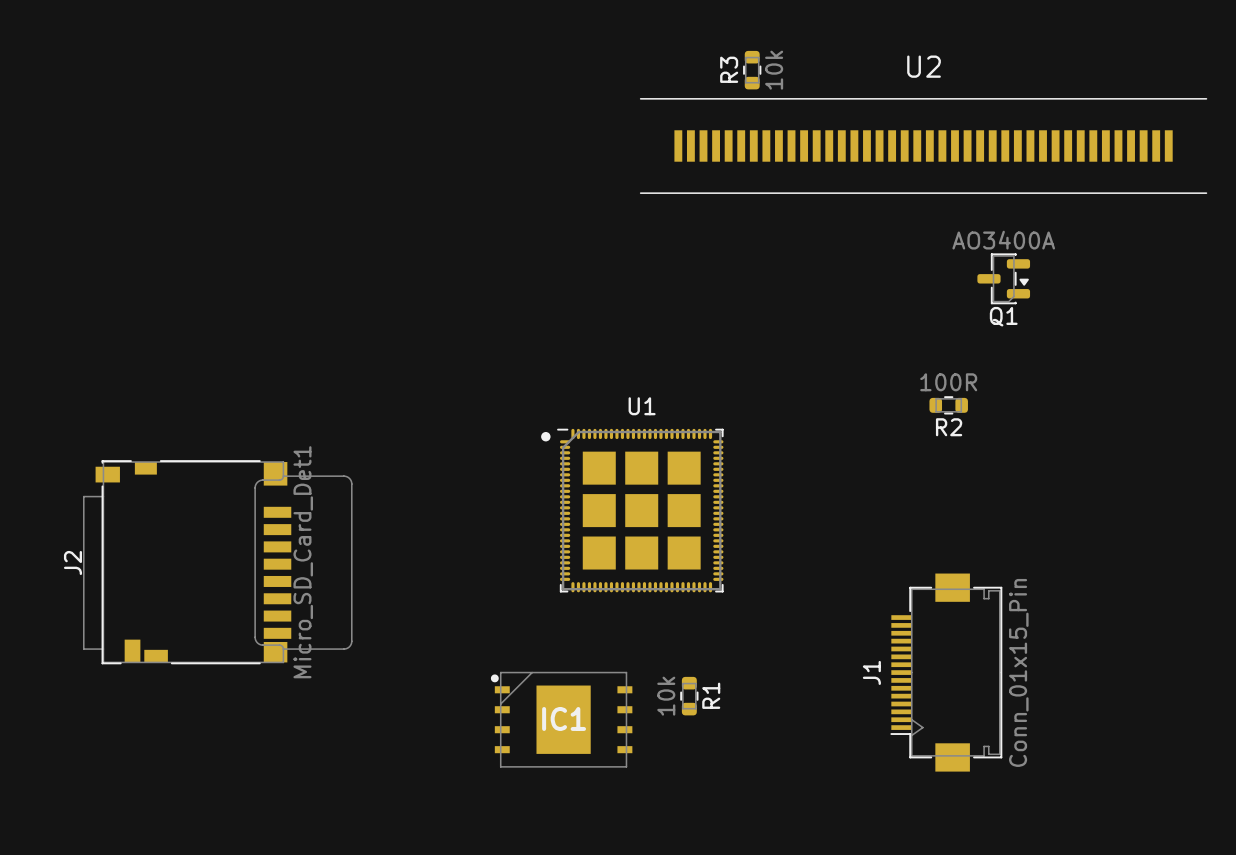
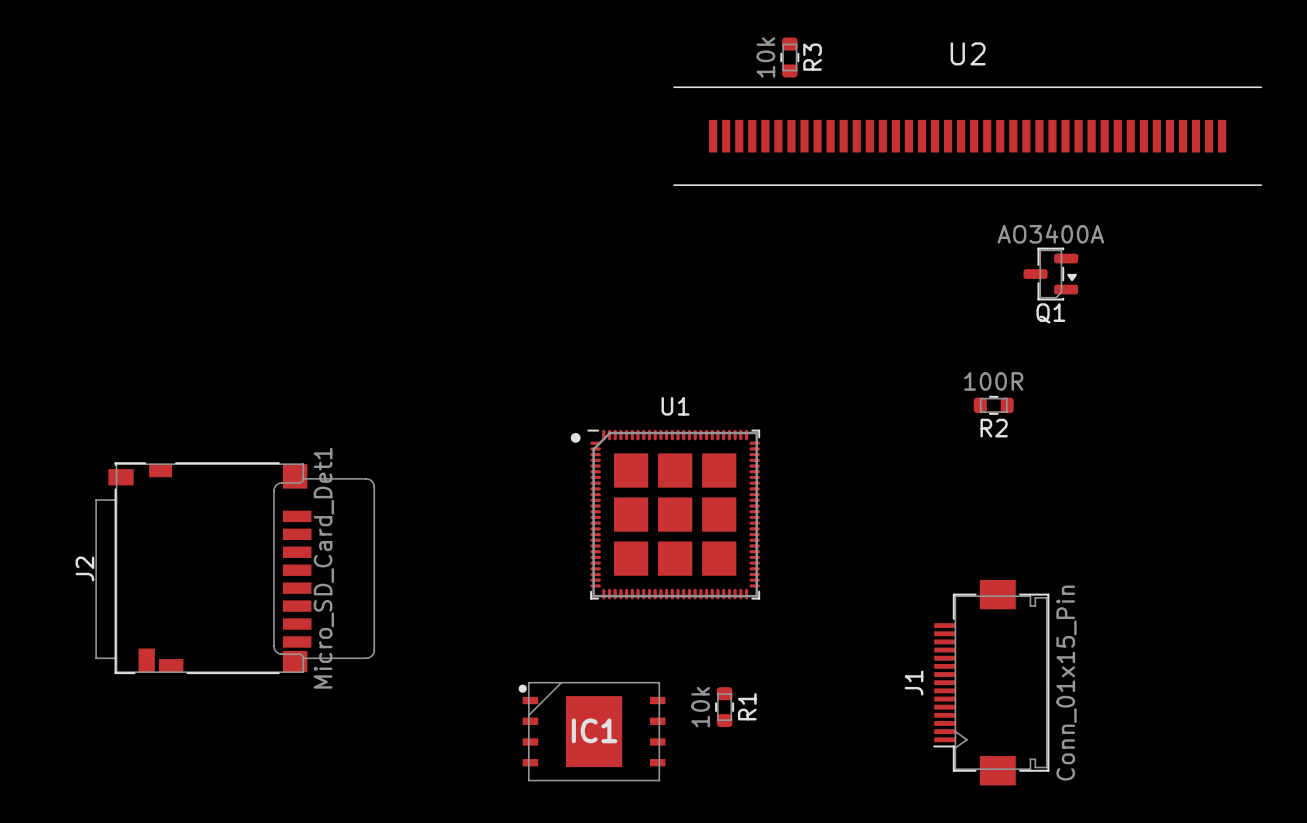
R3 name position: R3 (729, 69) -> R3 (812, 57)
R3 value position: 10k (774, 70) -> 10k (765, 57)

